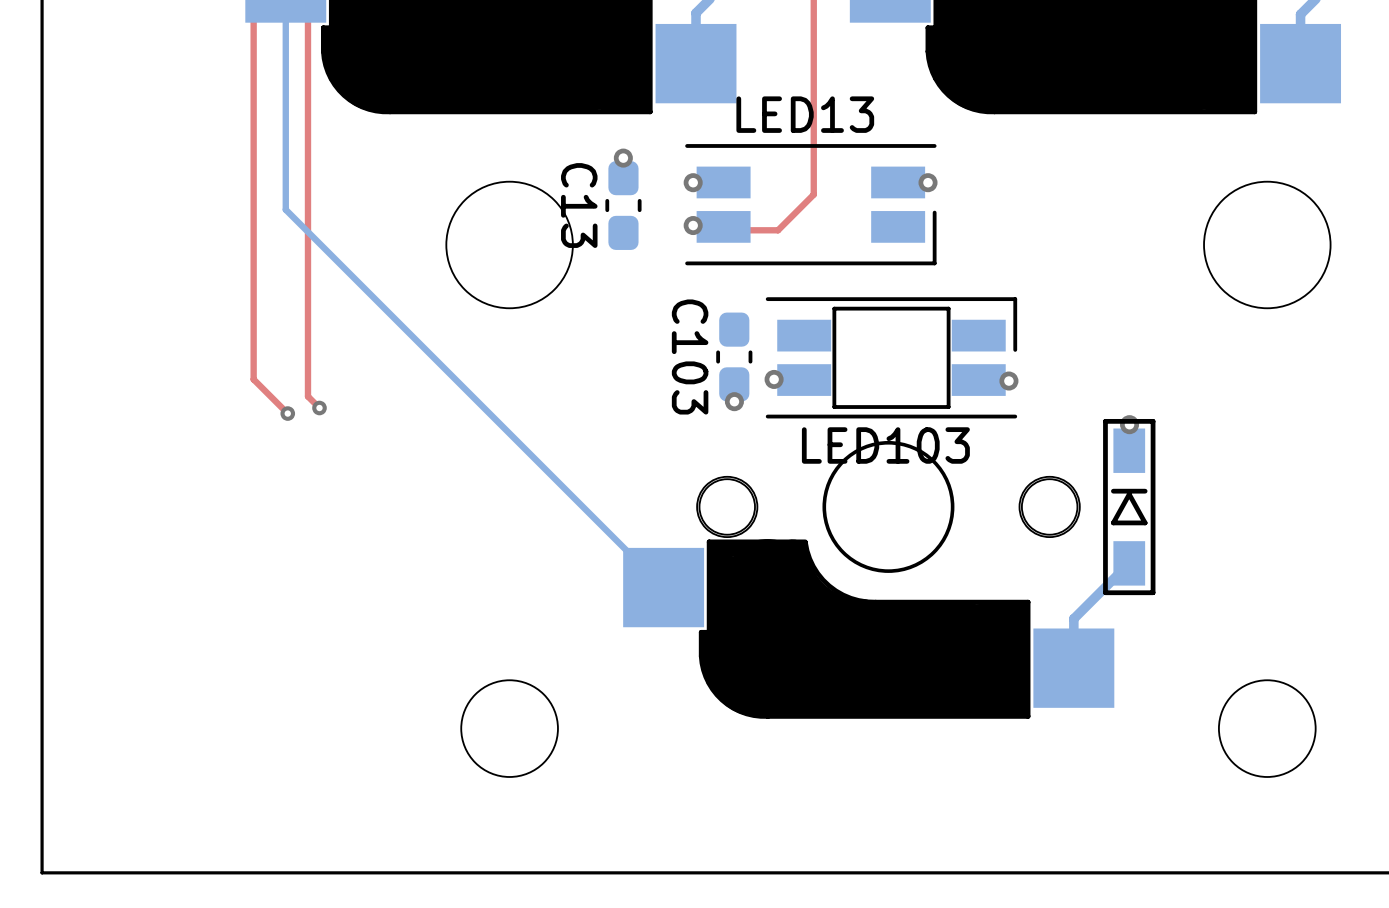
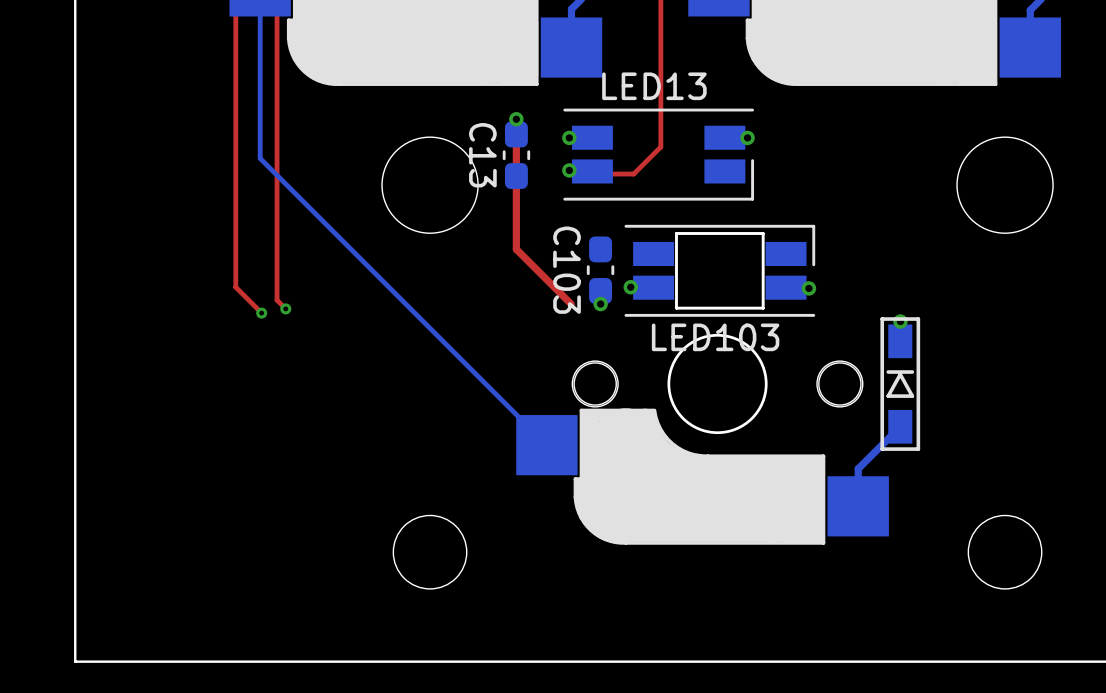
top track: none -> (516, 119) (516, 249) (571, 304)

